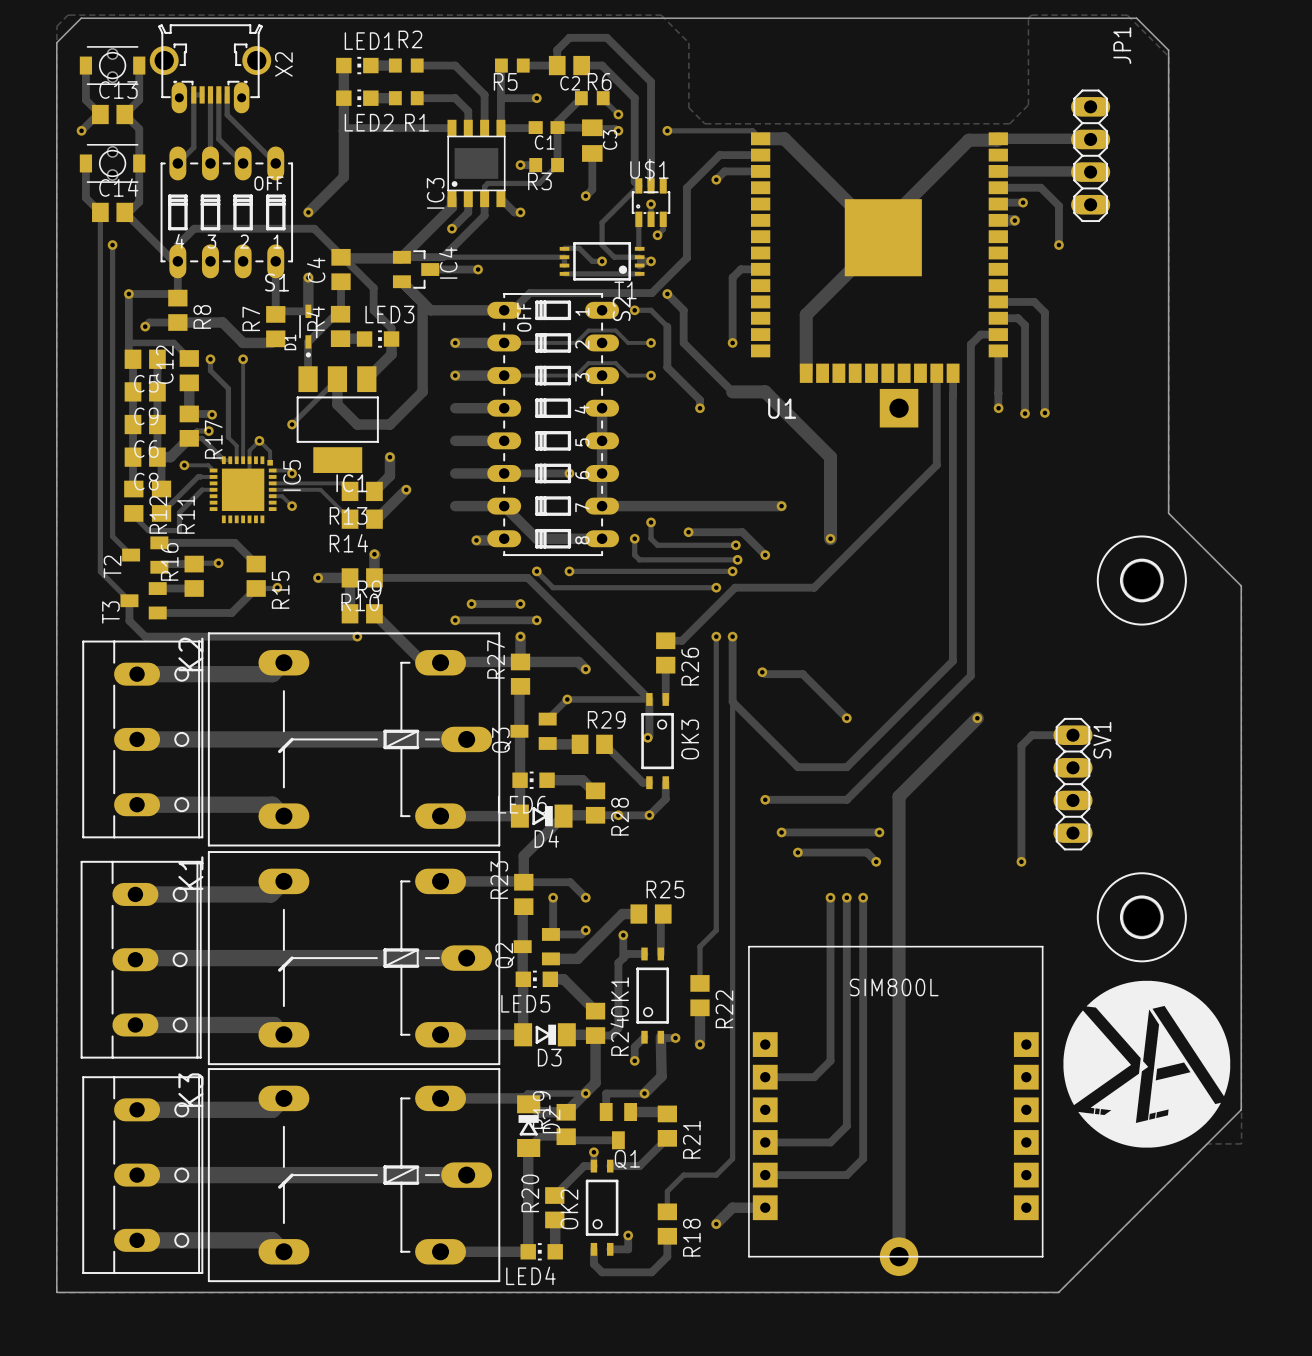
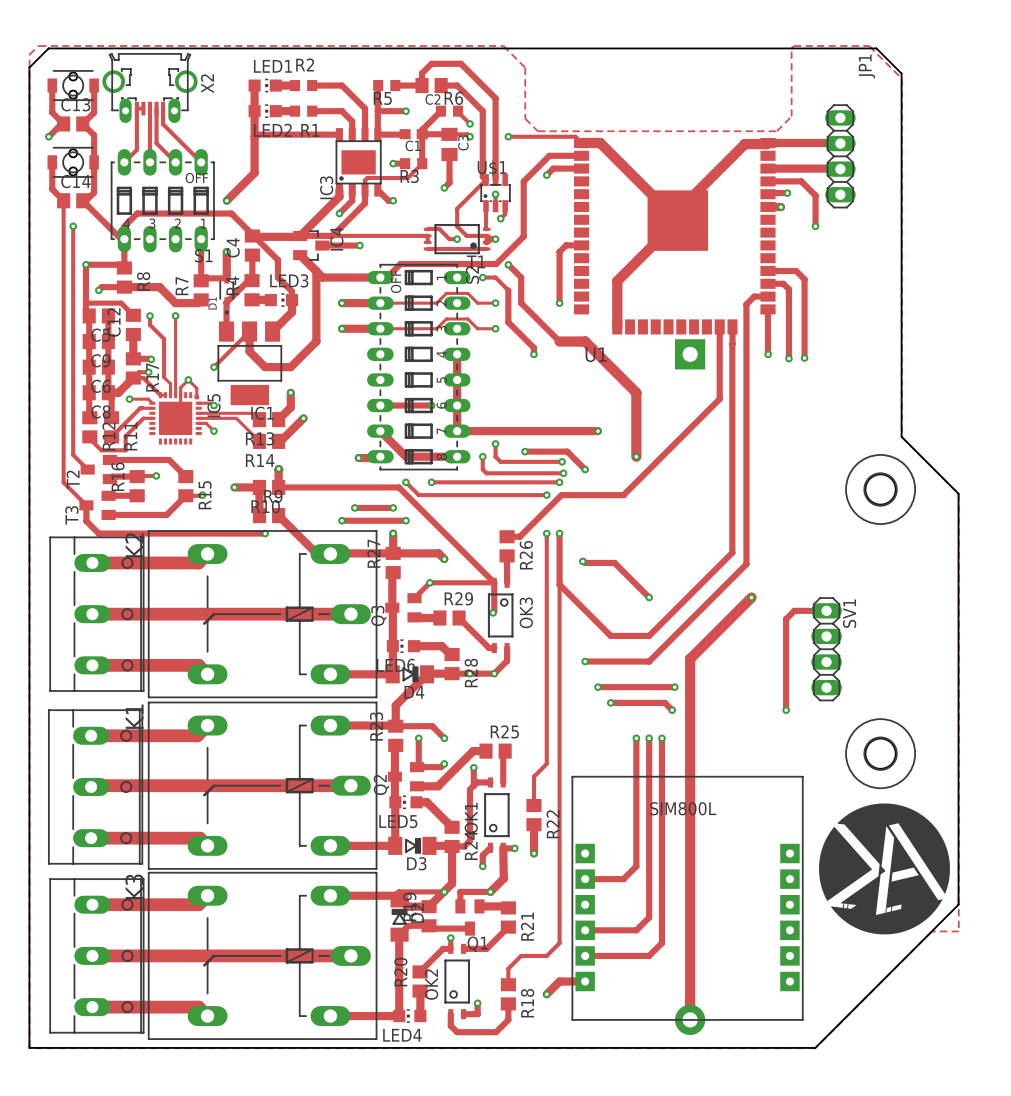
track: (455, 408) (504, 408) -> none
track: (455, 440) (504, 440) -> none
track: (455, 473) (504, 473) -> none
track: (455, 506) (504, 506) -> none

